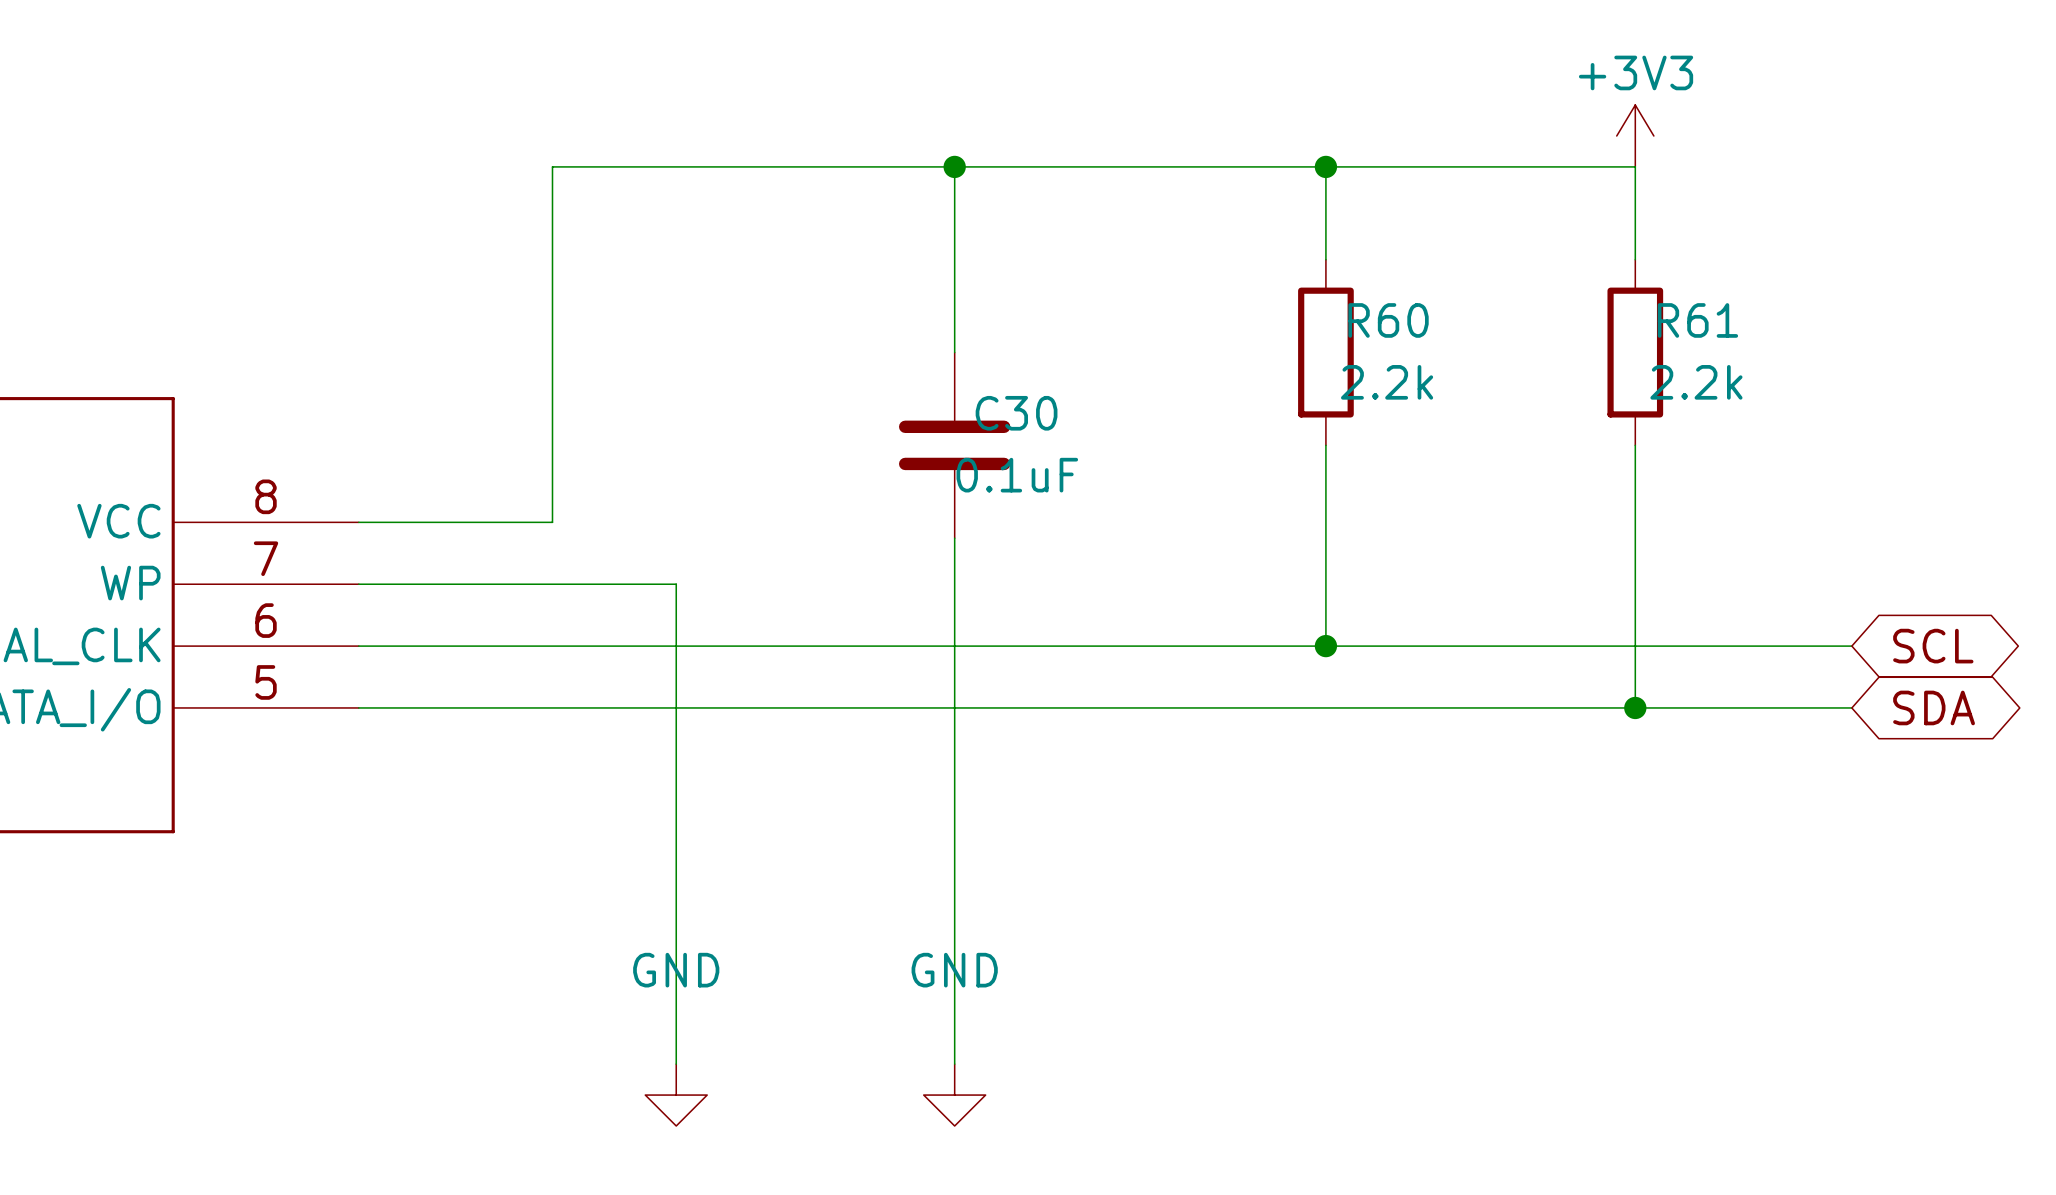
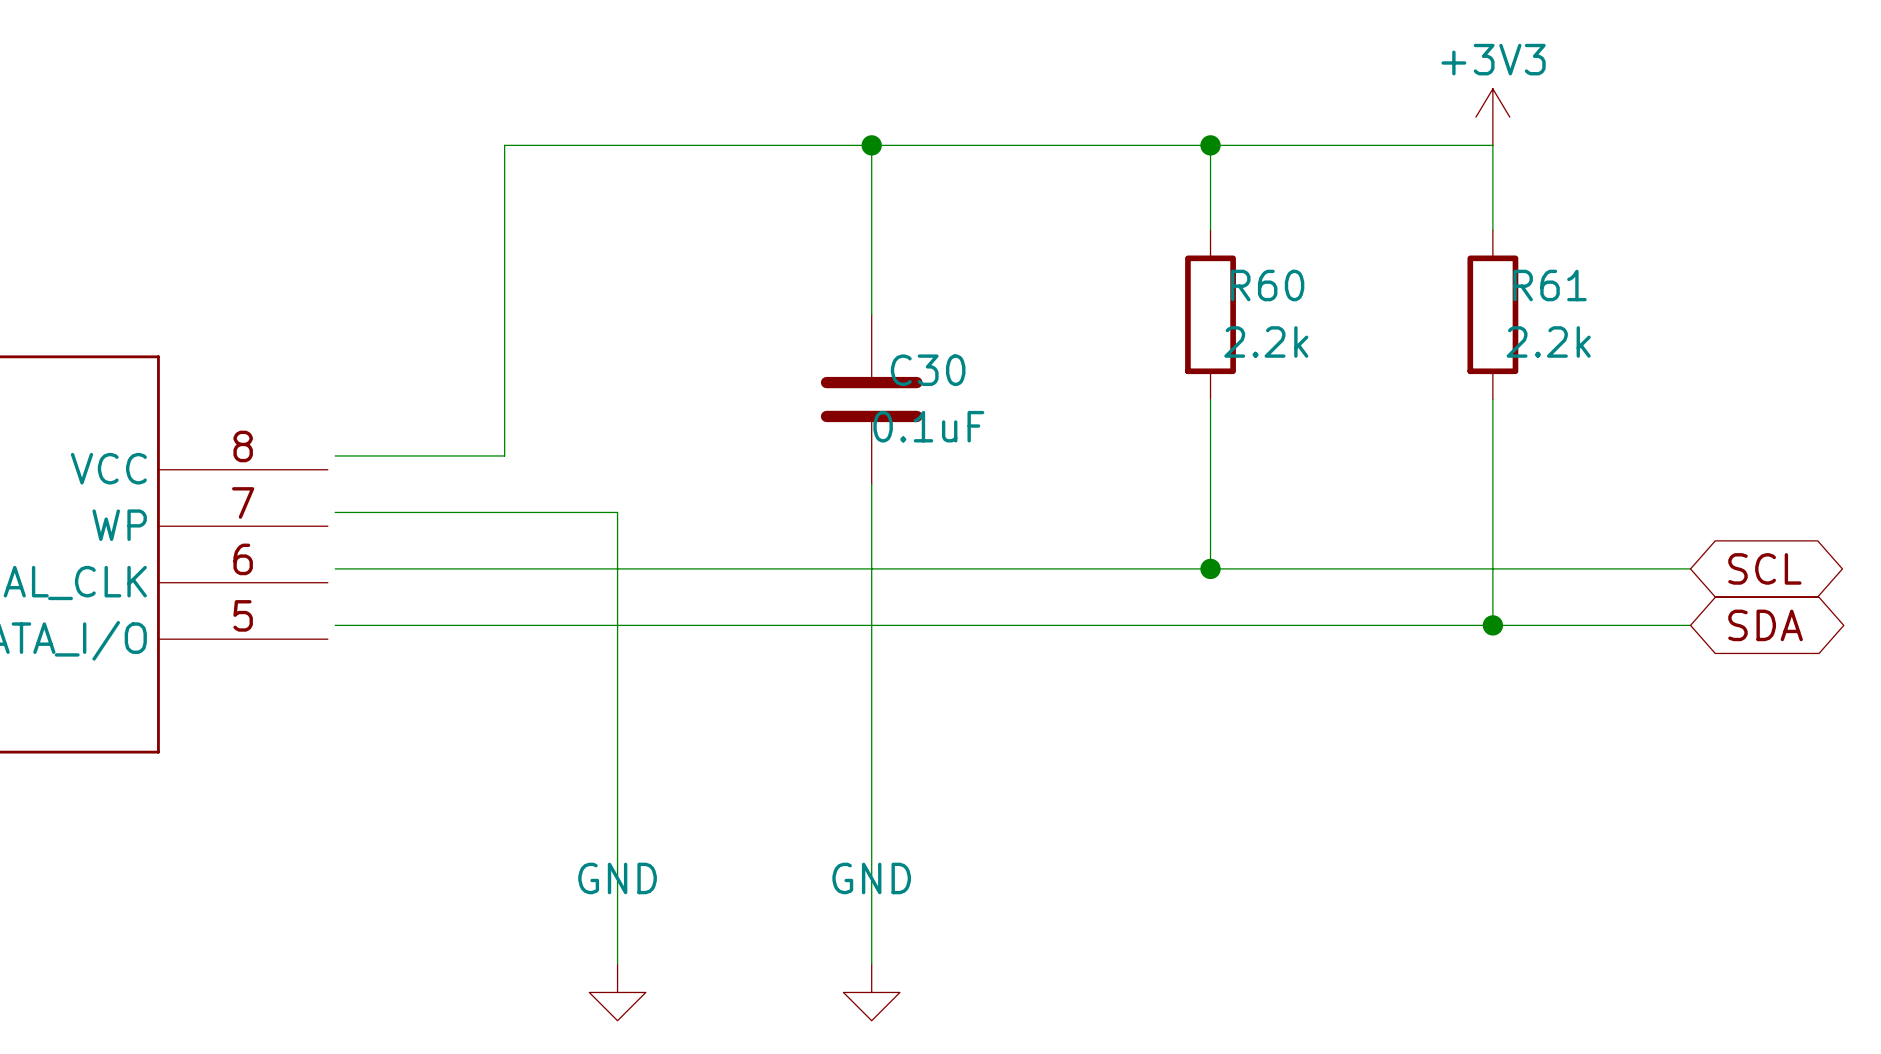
wire: (552, 507) (552, 522) (358, 522) -> (504, 455) (335, 455)
wire: (358, 584) (676, 584) -> (335, 512) (617, 512) (617, 526)
wire: none -> (335, 568) (1690, 568)
wire: (358, 646) (1851, 646) -> none
junction position: (1325, 646) -> (1210, 568)
global label position: SCL (1933, 646) -> SCL (1764, 568)
wire: none -> (335, 625) (1690, 625)
wire: (358, 707) (1851, 707) -> none
junction position: (1635, 707) -> (1492, 625)
global label position: SDA (1934, 707) -> SDA (1765, 625)

